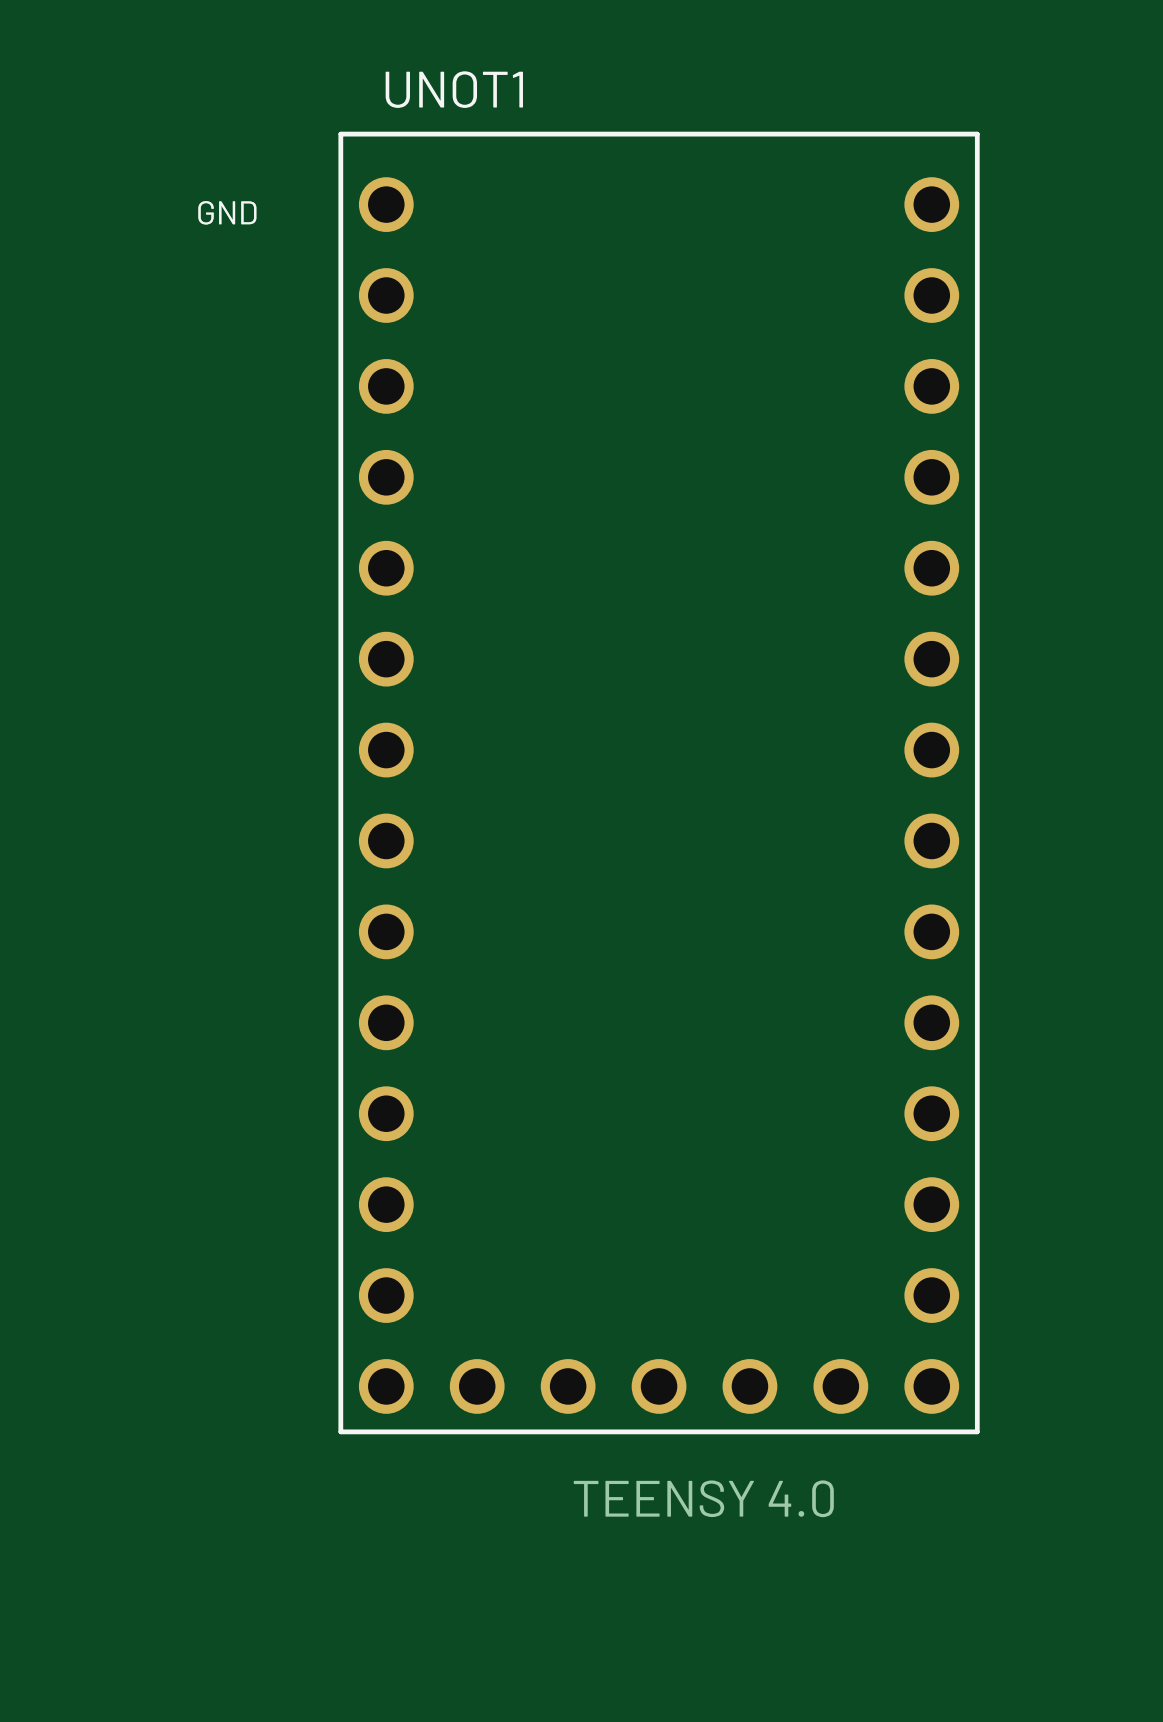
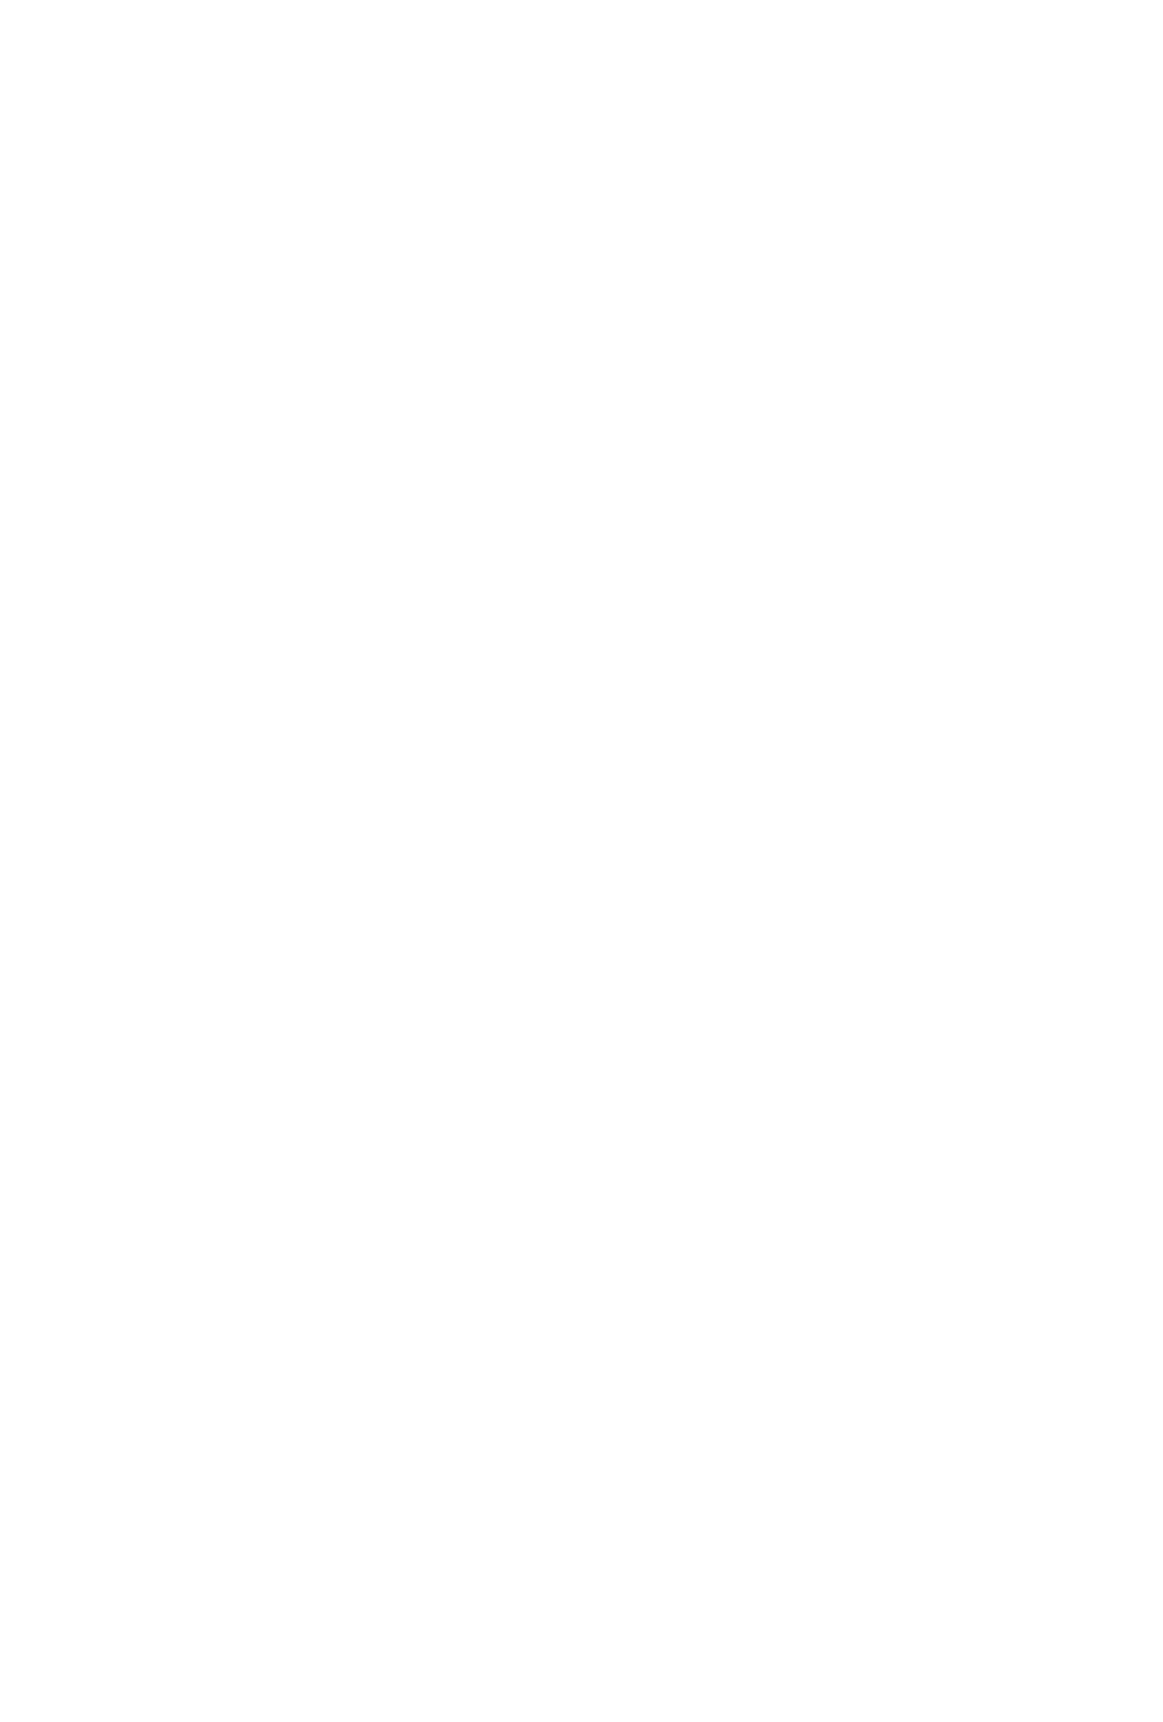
UNOT1: TEENSY 4.0 (659, 782) -> none

